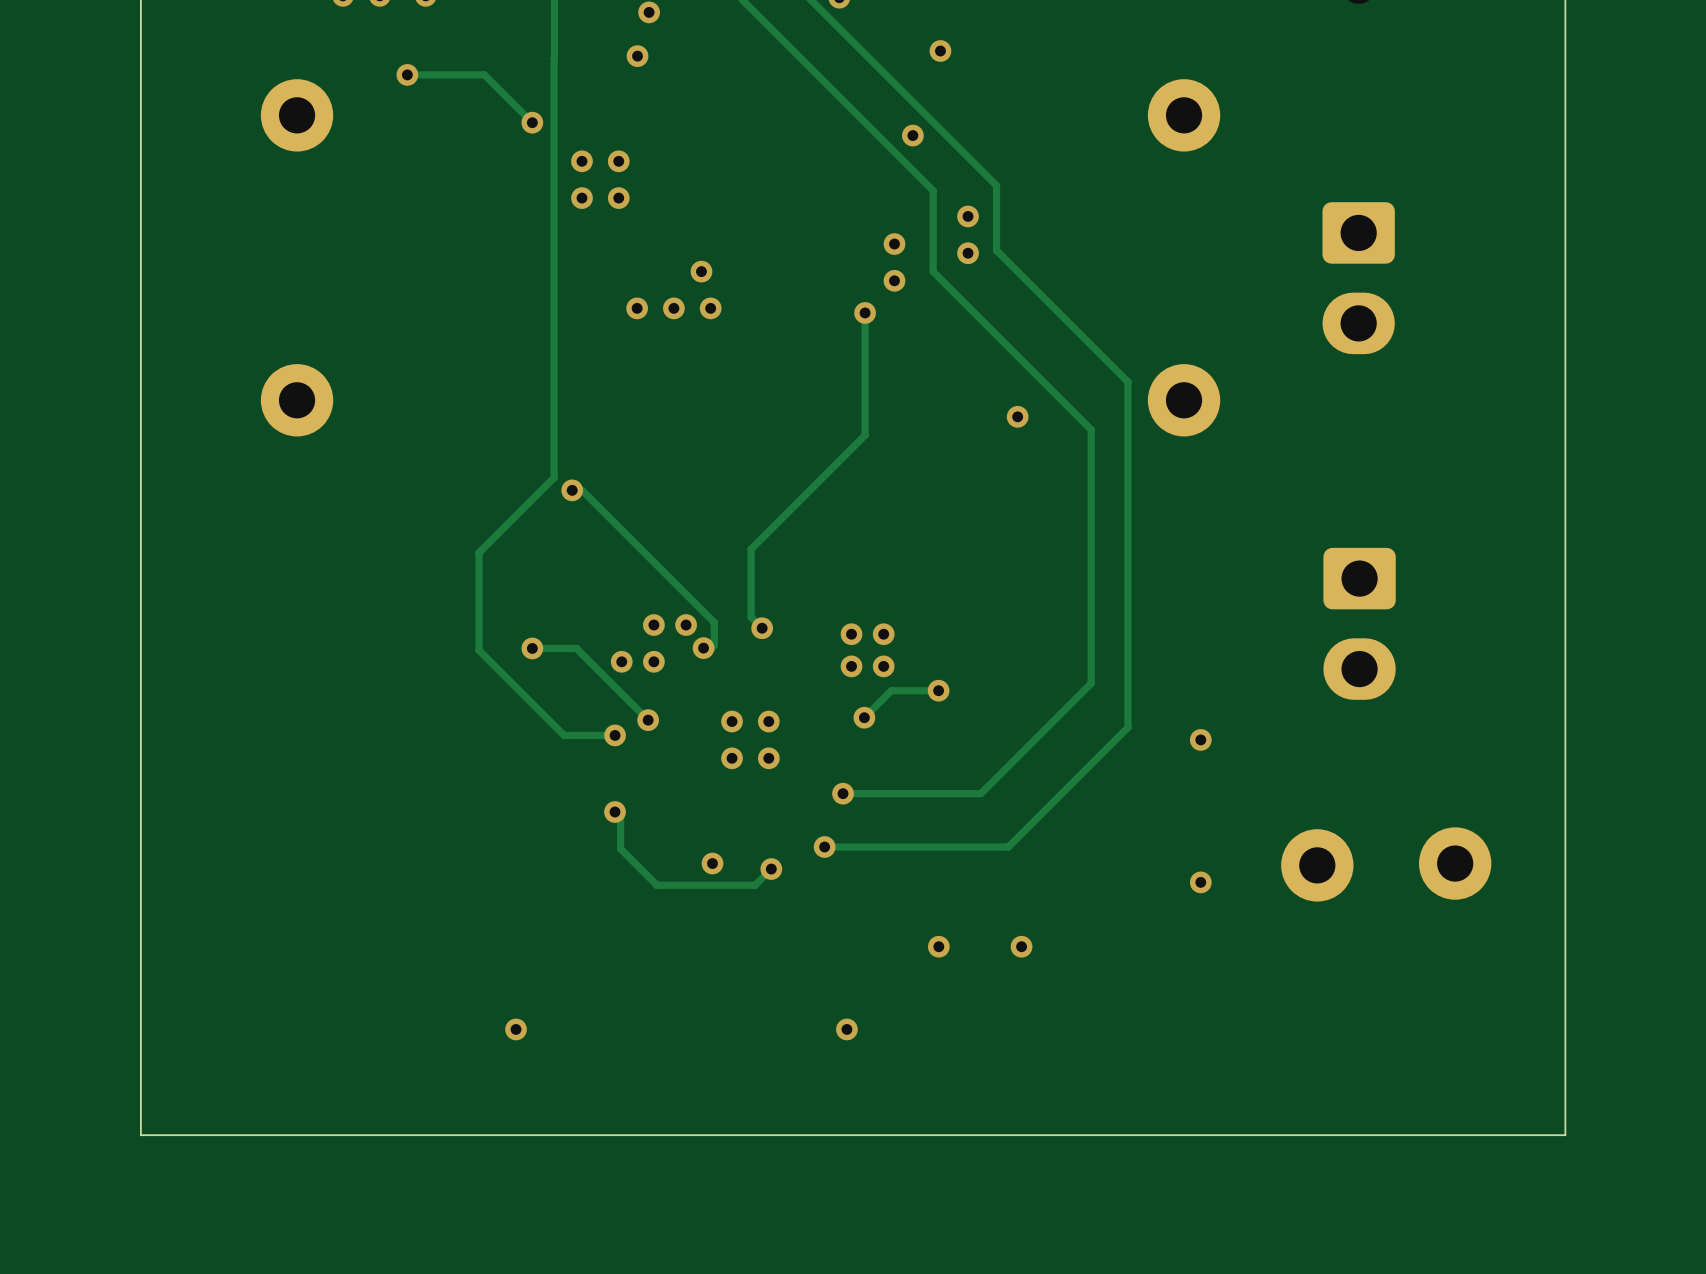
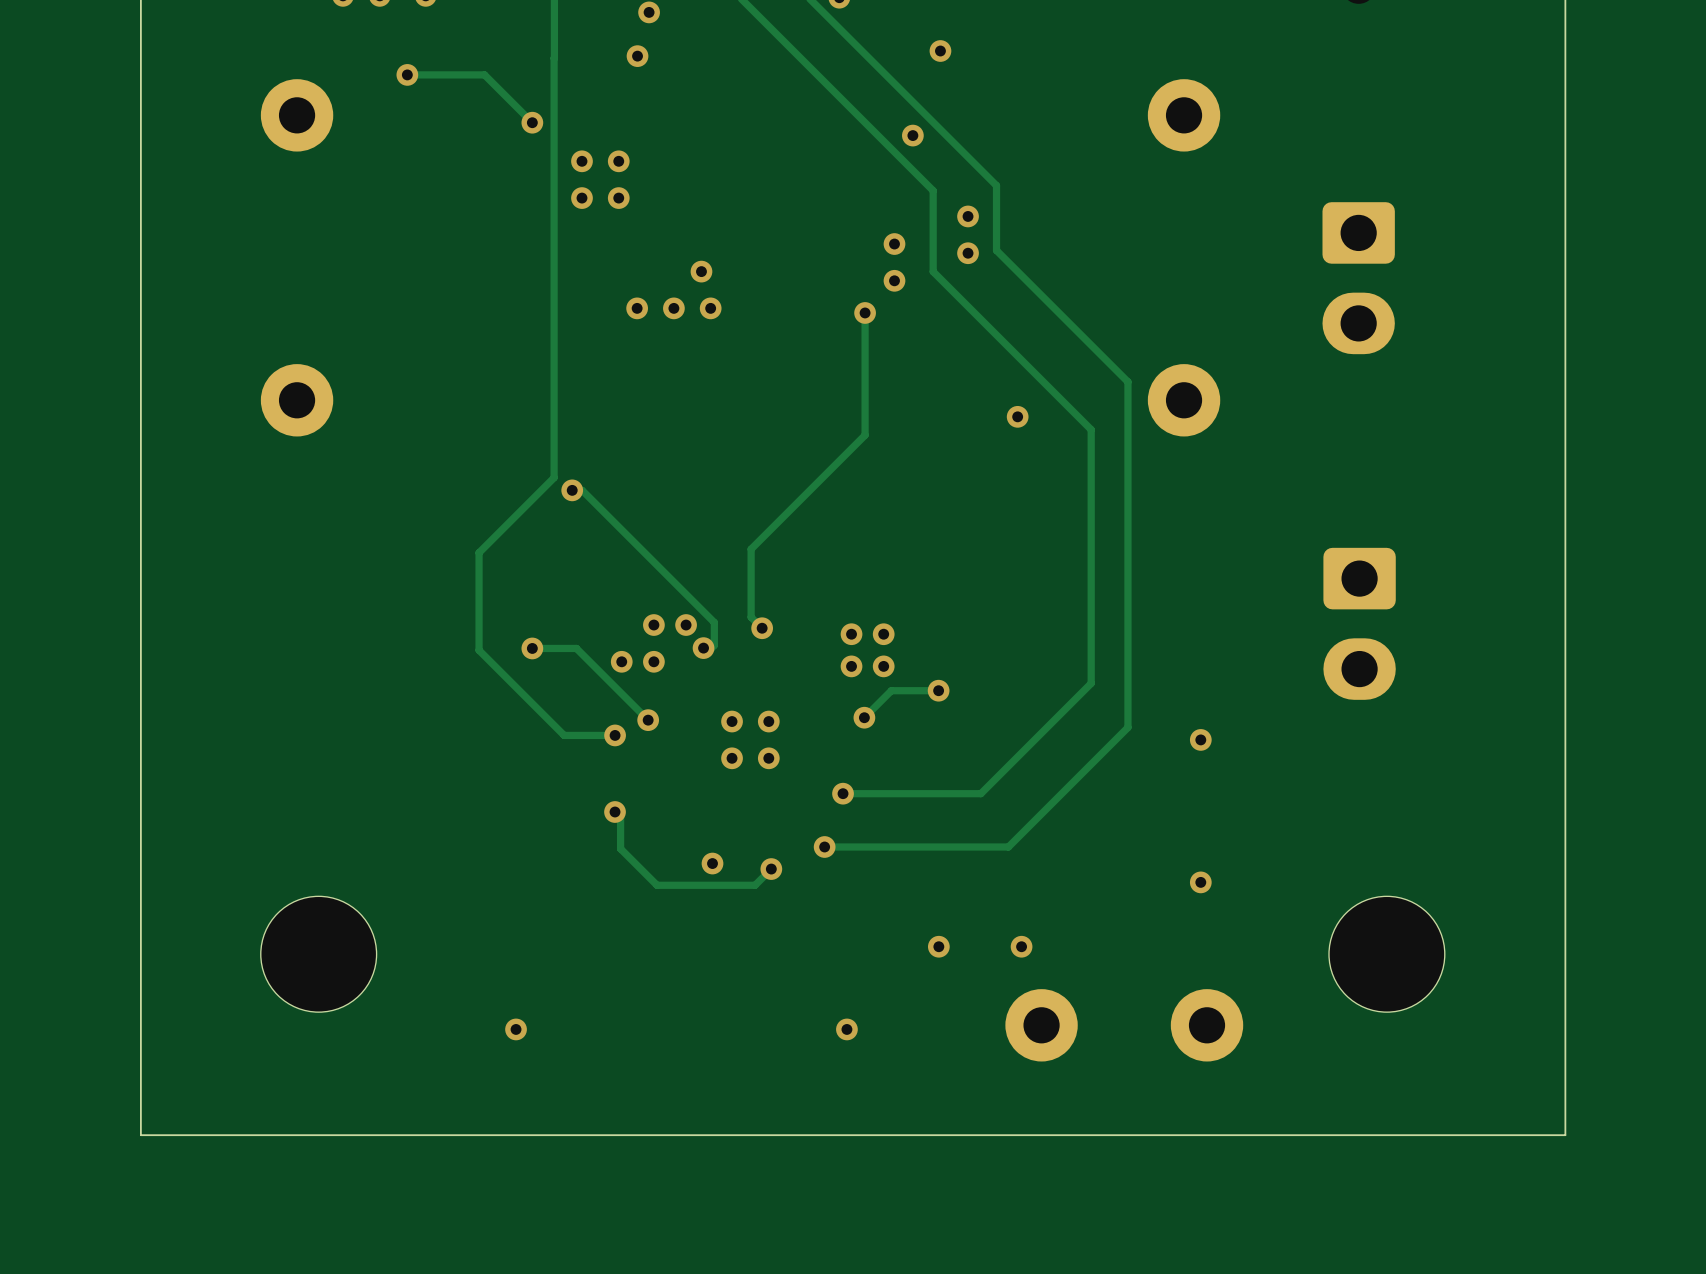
part: (1455, 863) -> none
part: (1317, 865) -> none
part: none -> (318, 954)
part: none -> (1386, 954)
part: none -> (1041, 1025)
part: none -> (1207, 1025)

